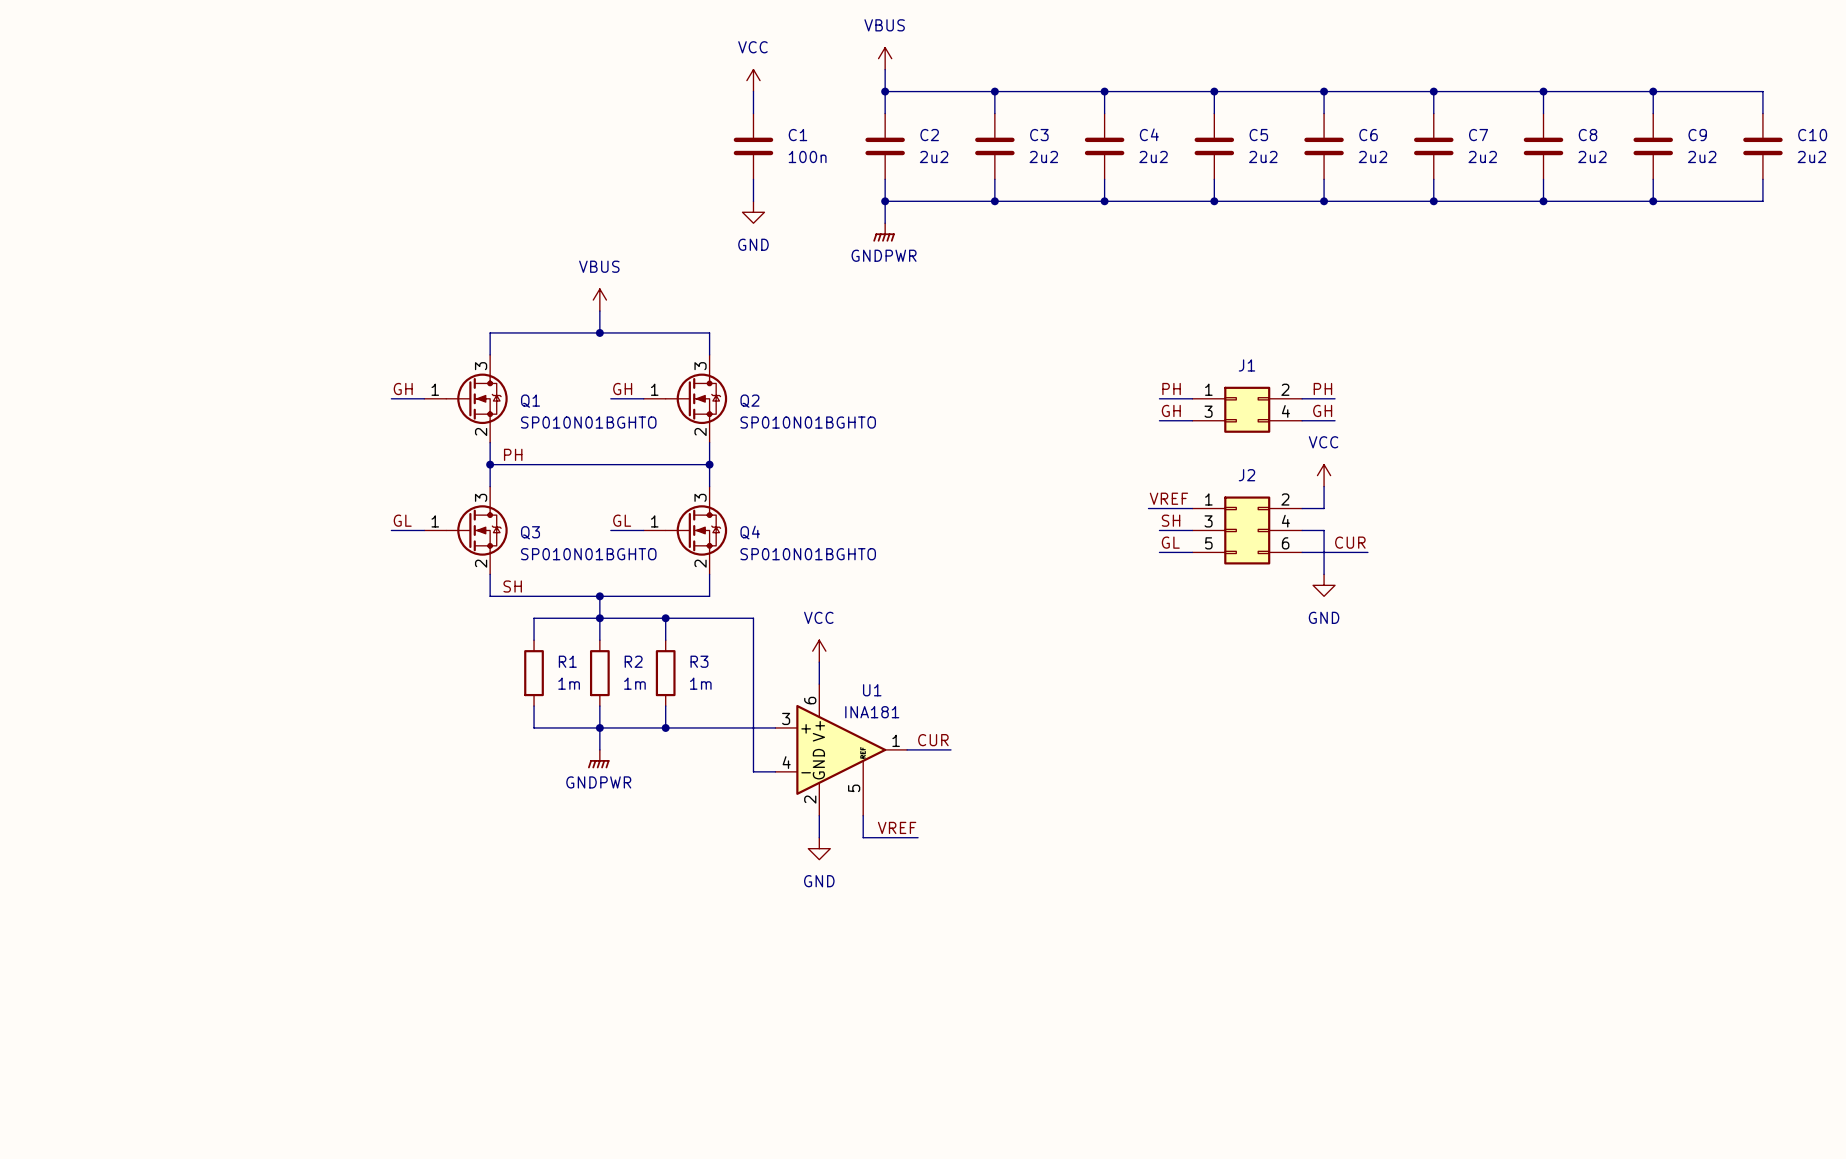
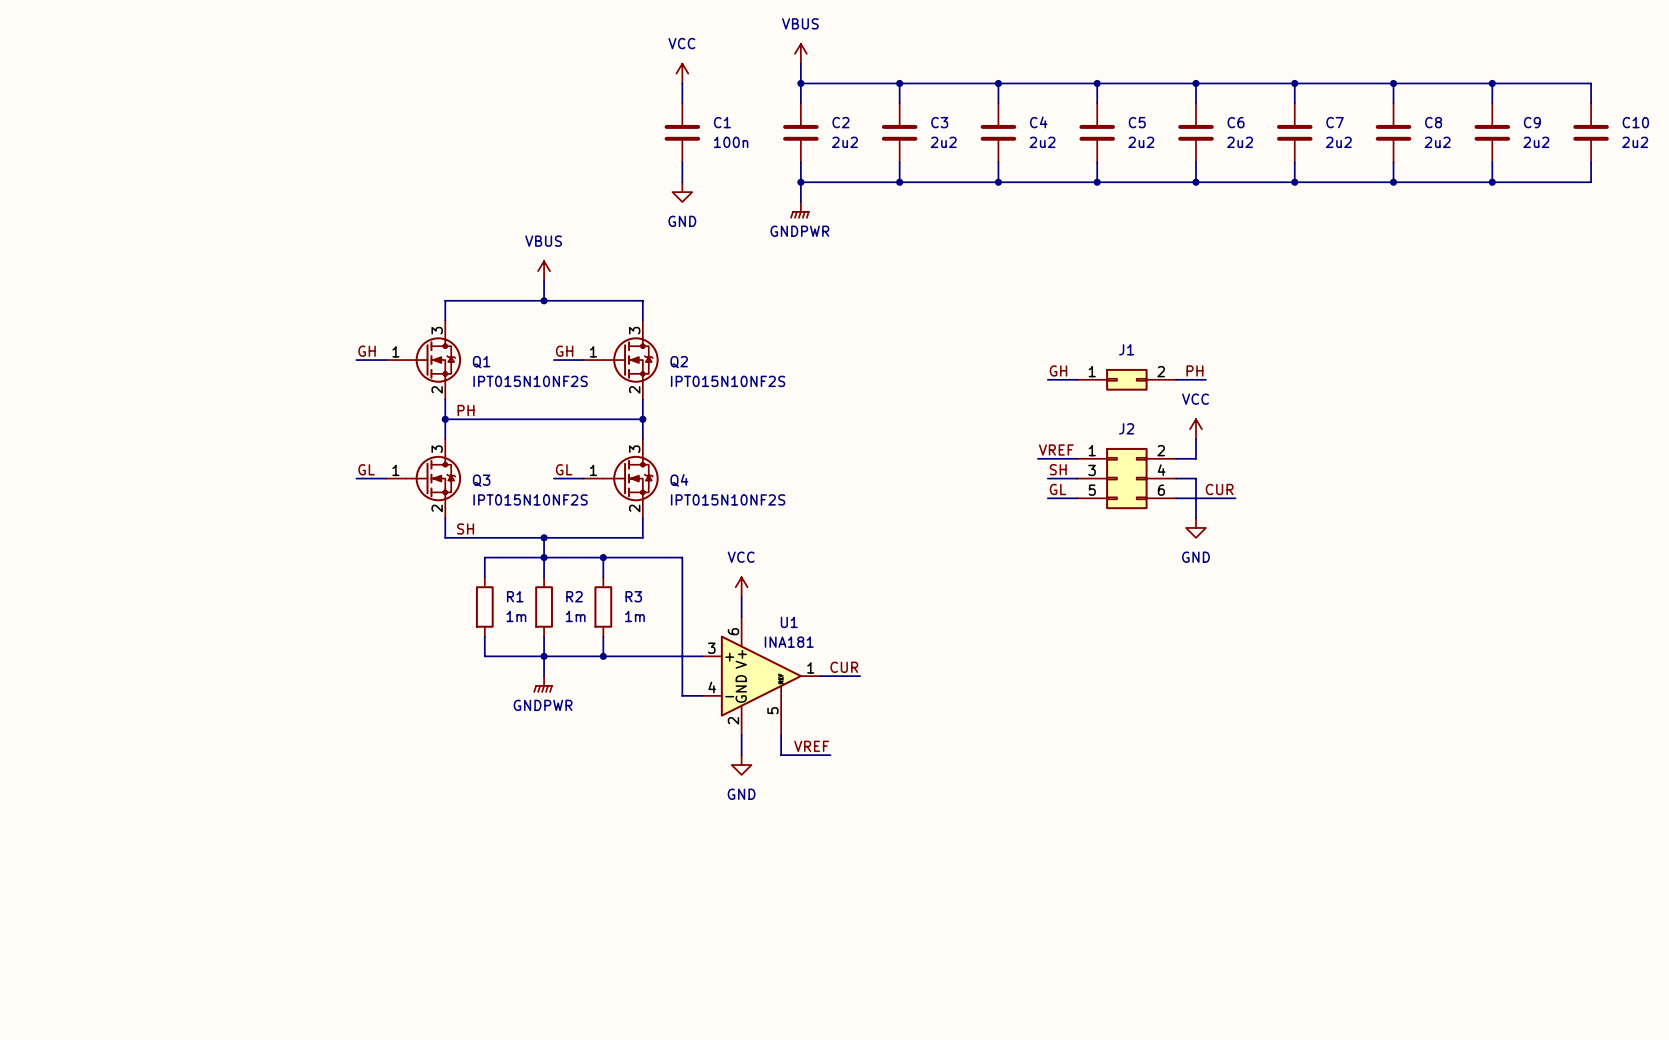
J1 symbol: [1192, 386, 1303, 433] -> [1077, 368, 1177, 391]
label: PH (1171, 389) -> none
label: PH (1322, 389) -> none
wire: (1159, 398) (1192, 398) -> none
wire: (1302, 398) (1335, 398) -> none
label: GH (1322, 410) -> PH (1194, 370)
Q1 value: SP010N01BGHTO (588, 422) -> IPT015N10NF2S (530, 381)
Q2 value: SP010N01BGHTO (808, 422) -> IPT015N10NF2S (728, 381)
Q3 value: SP010N01BGHTO (588, 554) -> IPT015N10NF2S (530, 499)
Q4 value: SP010N01BGHTO (808, 554) -> IPT015N10NF2S (728, 499)

